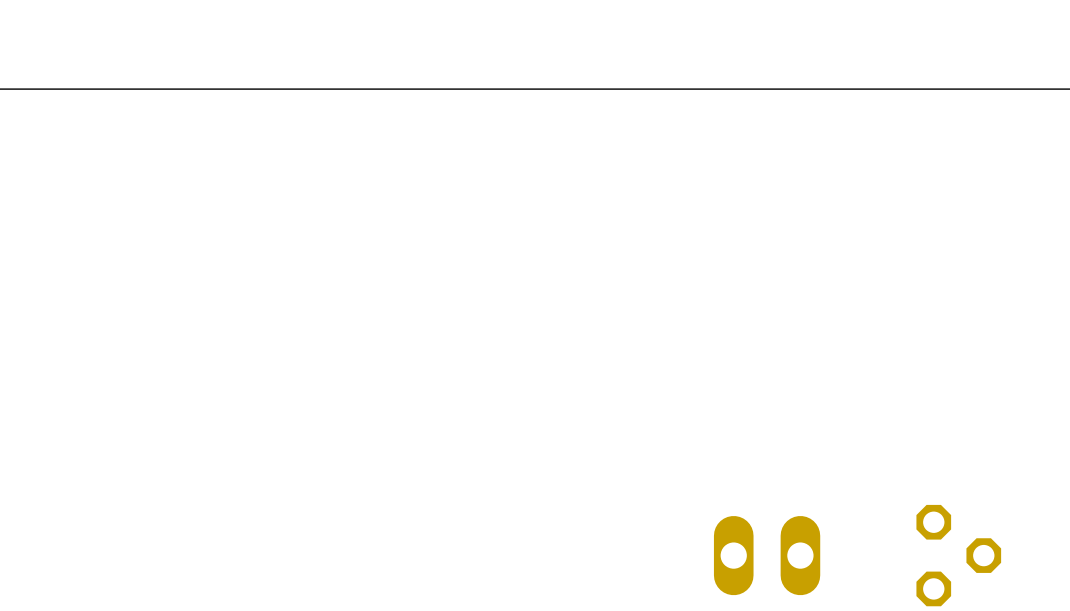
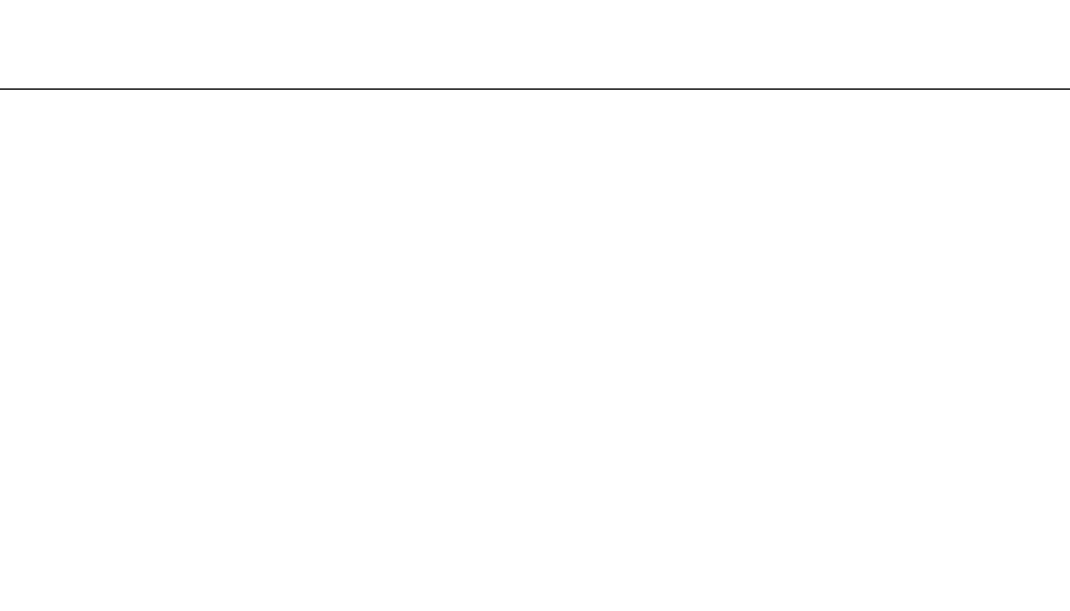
part: (767, 555) -> none
part: (958, 555) -> none

